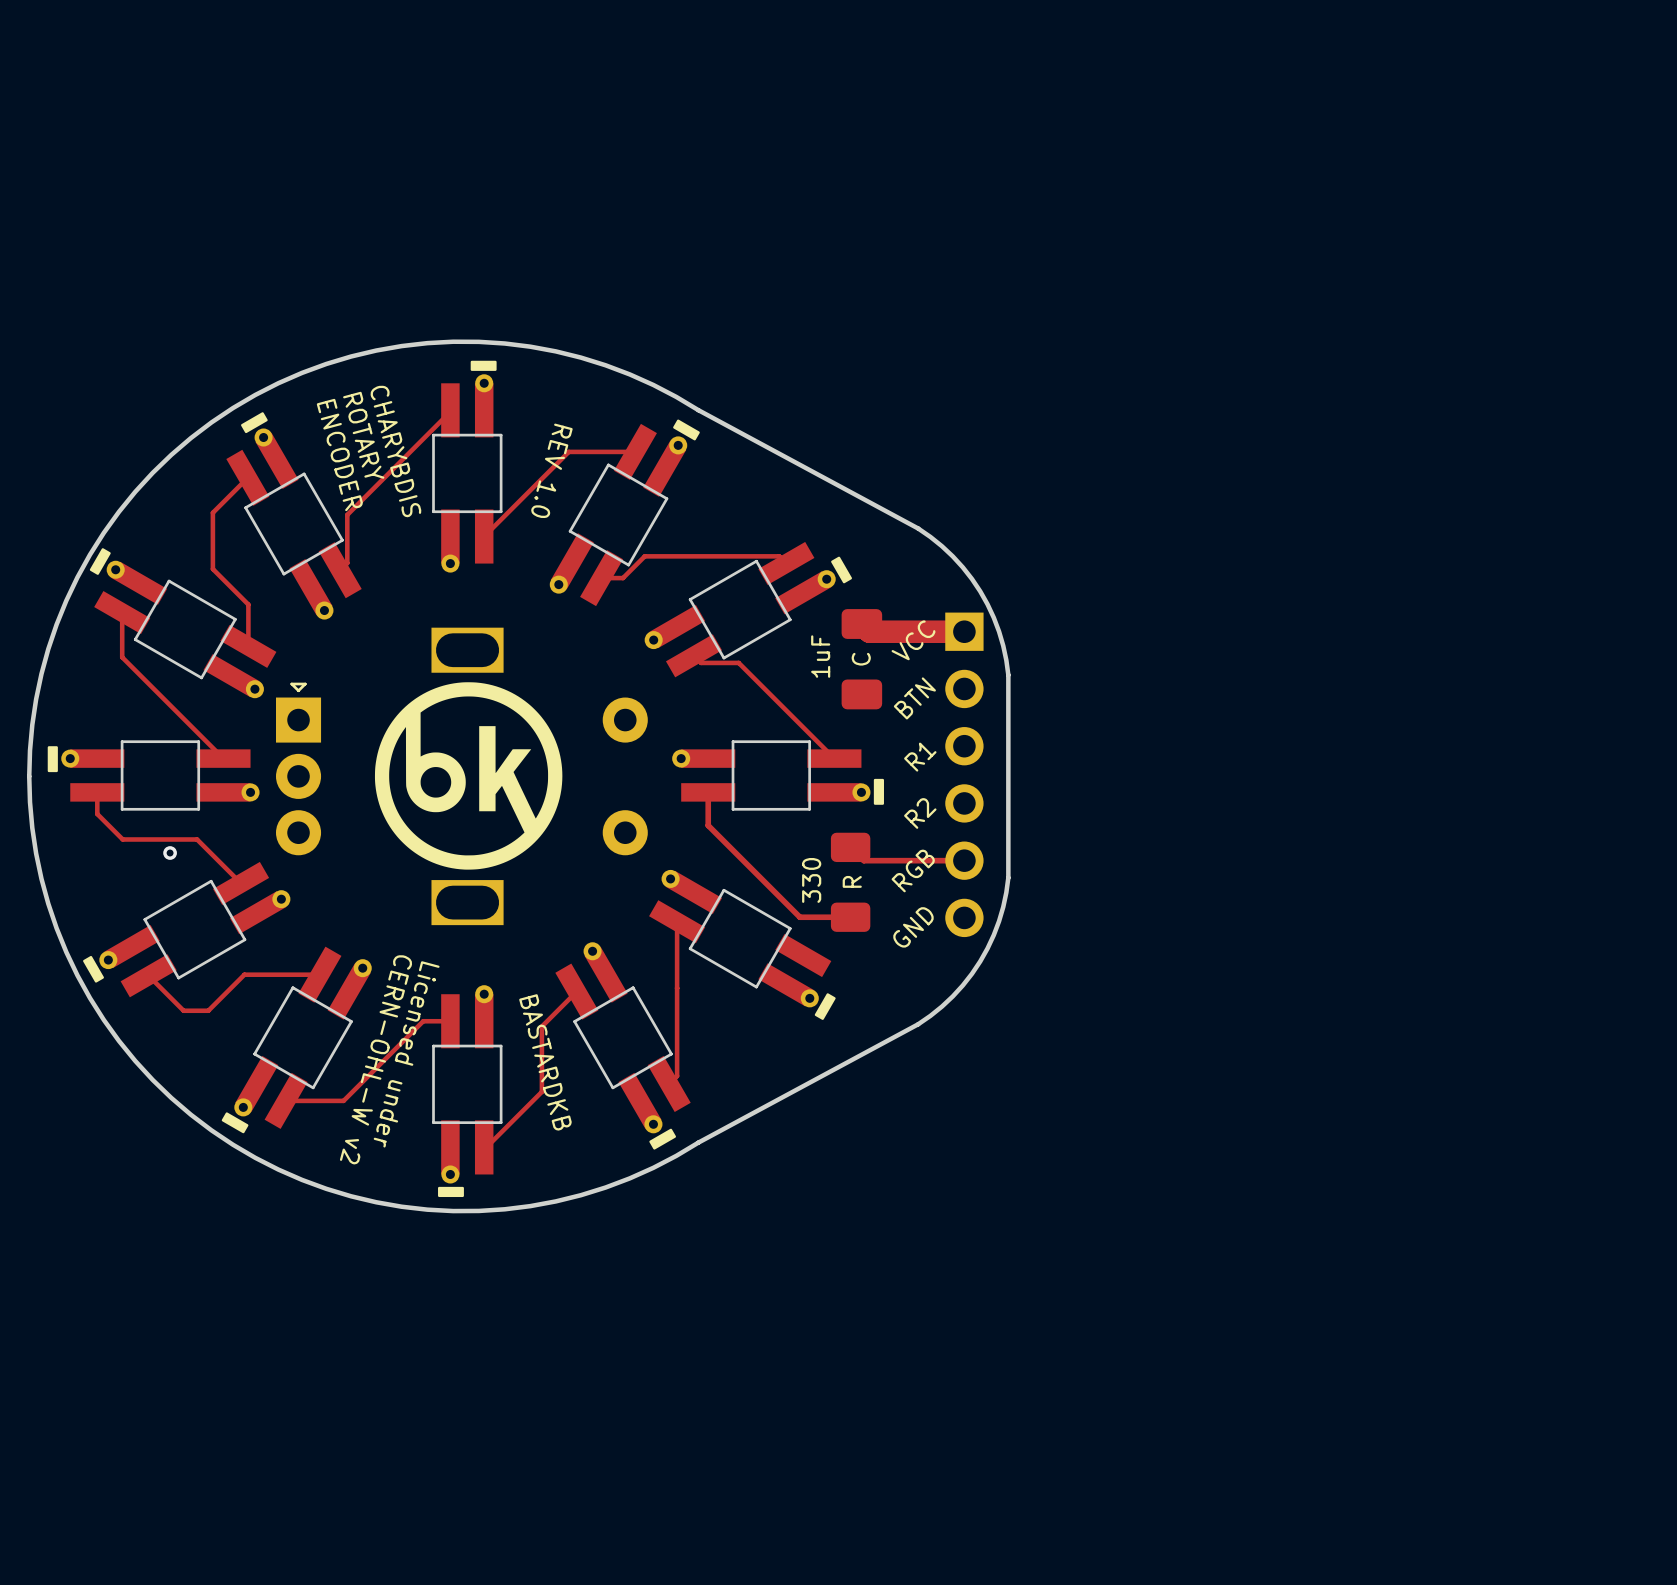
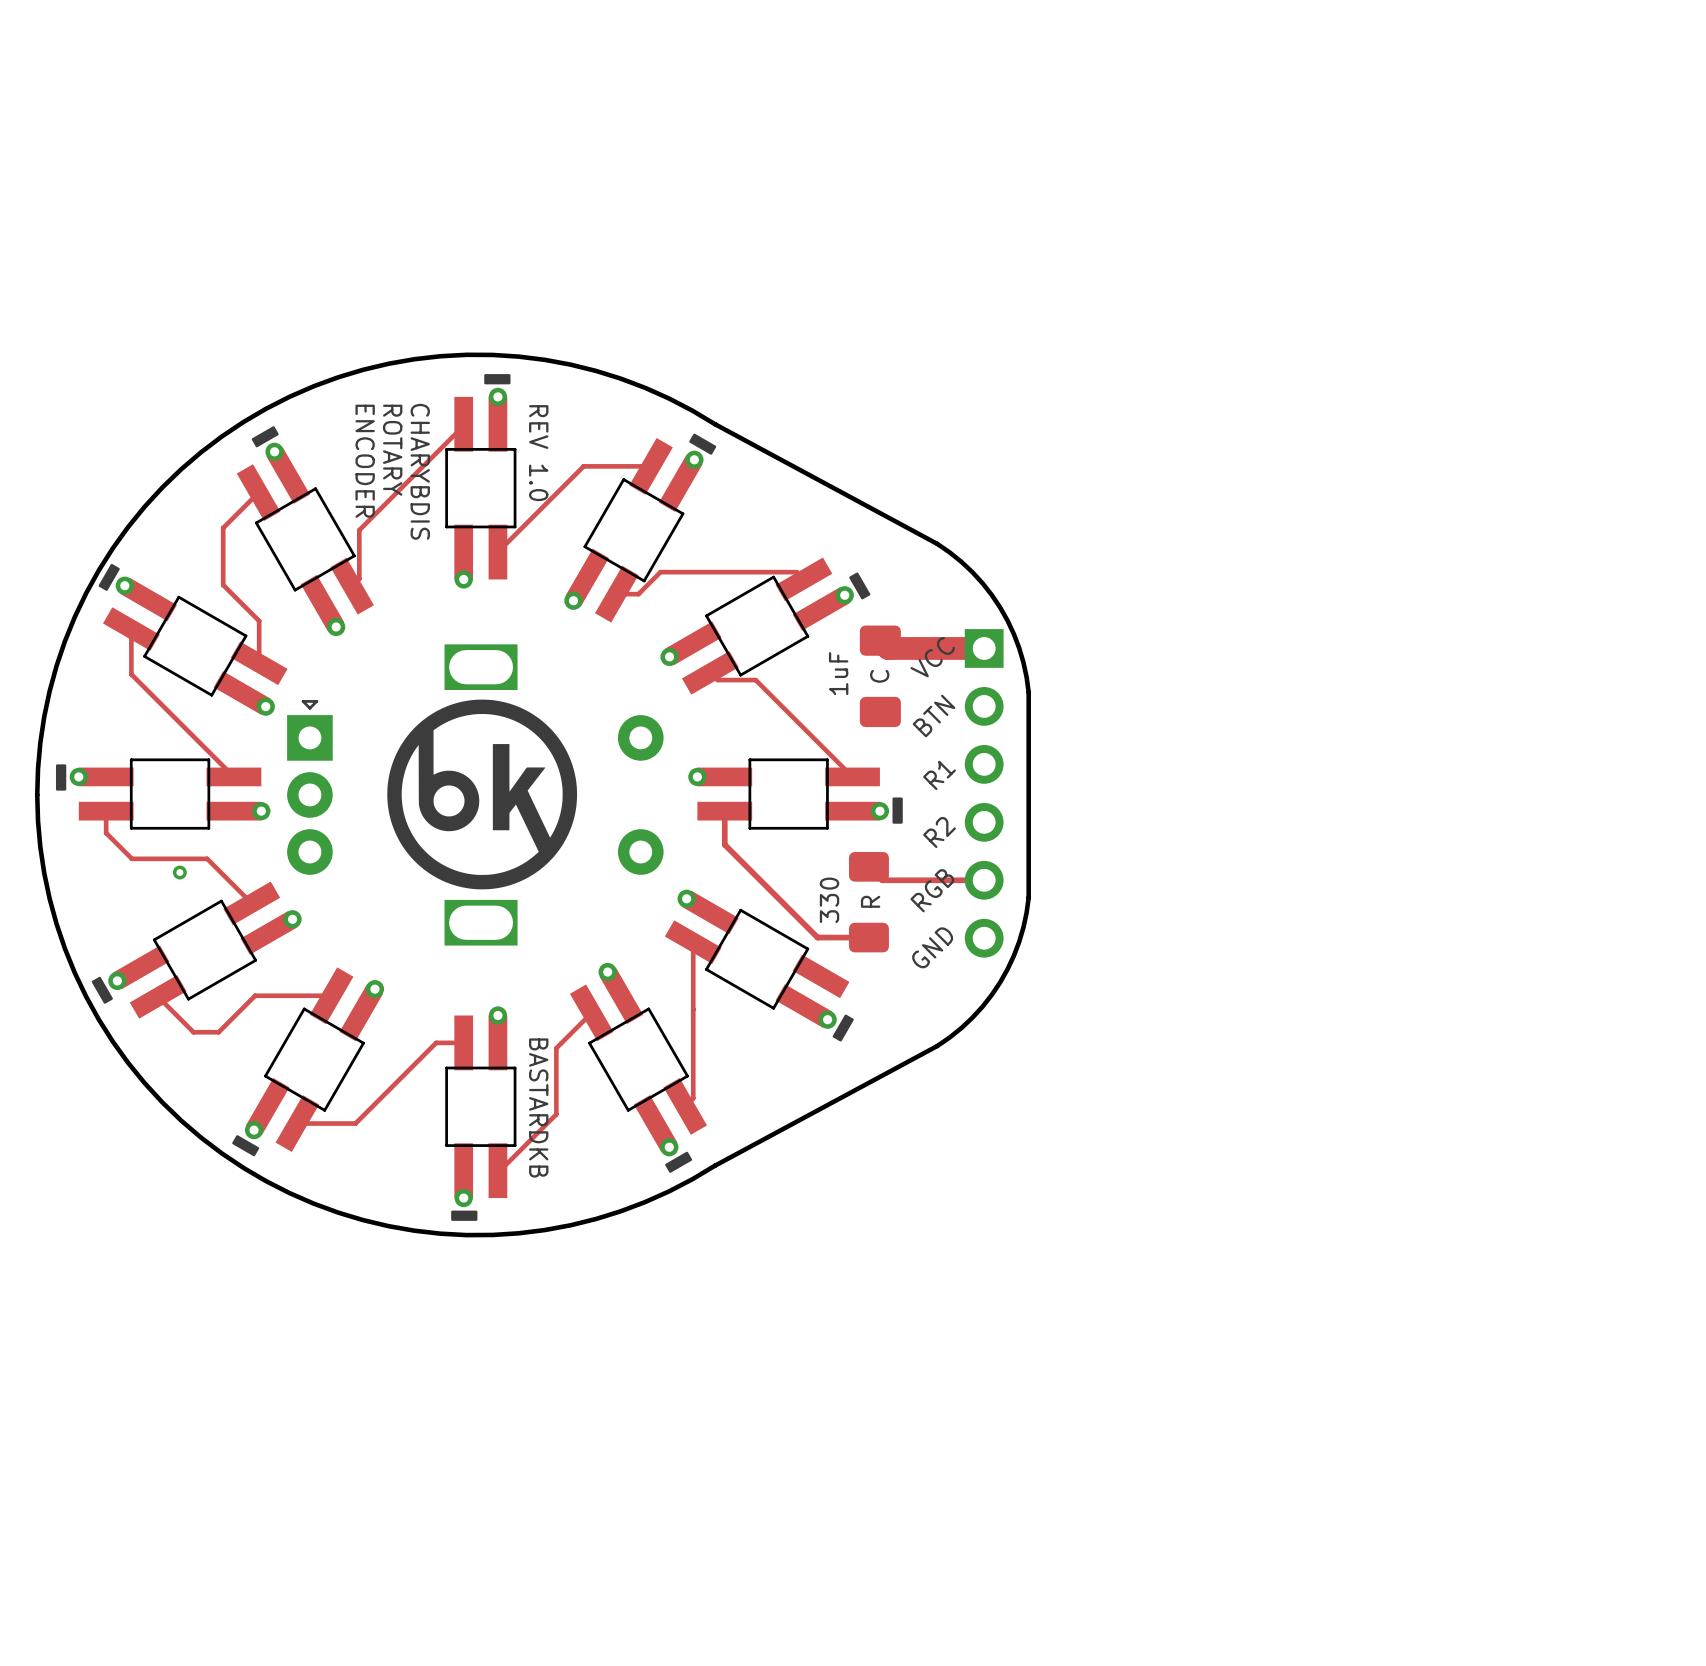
text: ROTARY (363, 435) -> ENCODER (365, 461)
text: CHARYBDIS (395, 451) -> ROTARY (392, 450)
text: ENCODER (339, 454) -> none
text: none -> CHARYBDIS (420, 471)
text rotation: 0° (551, 470) -> 15° counterclockwise (538, 453)
text: Licensed under (406, 1054) -> none
text: CERN-OHL-W v2 (375, 1059) -> none
text rotation: 0° (545, 1062) -> 15° clockwise (538, 1107)

